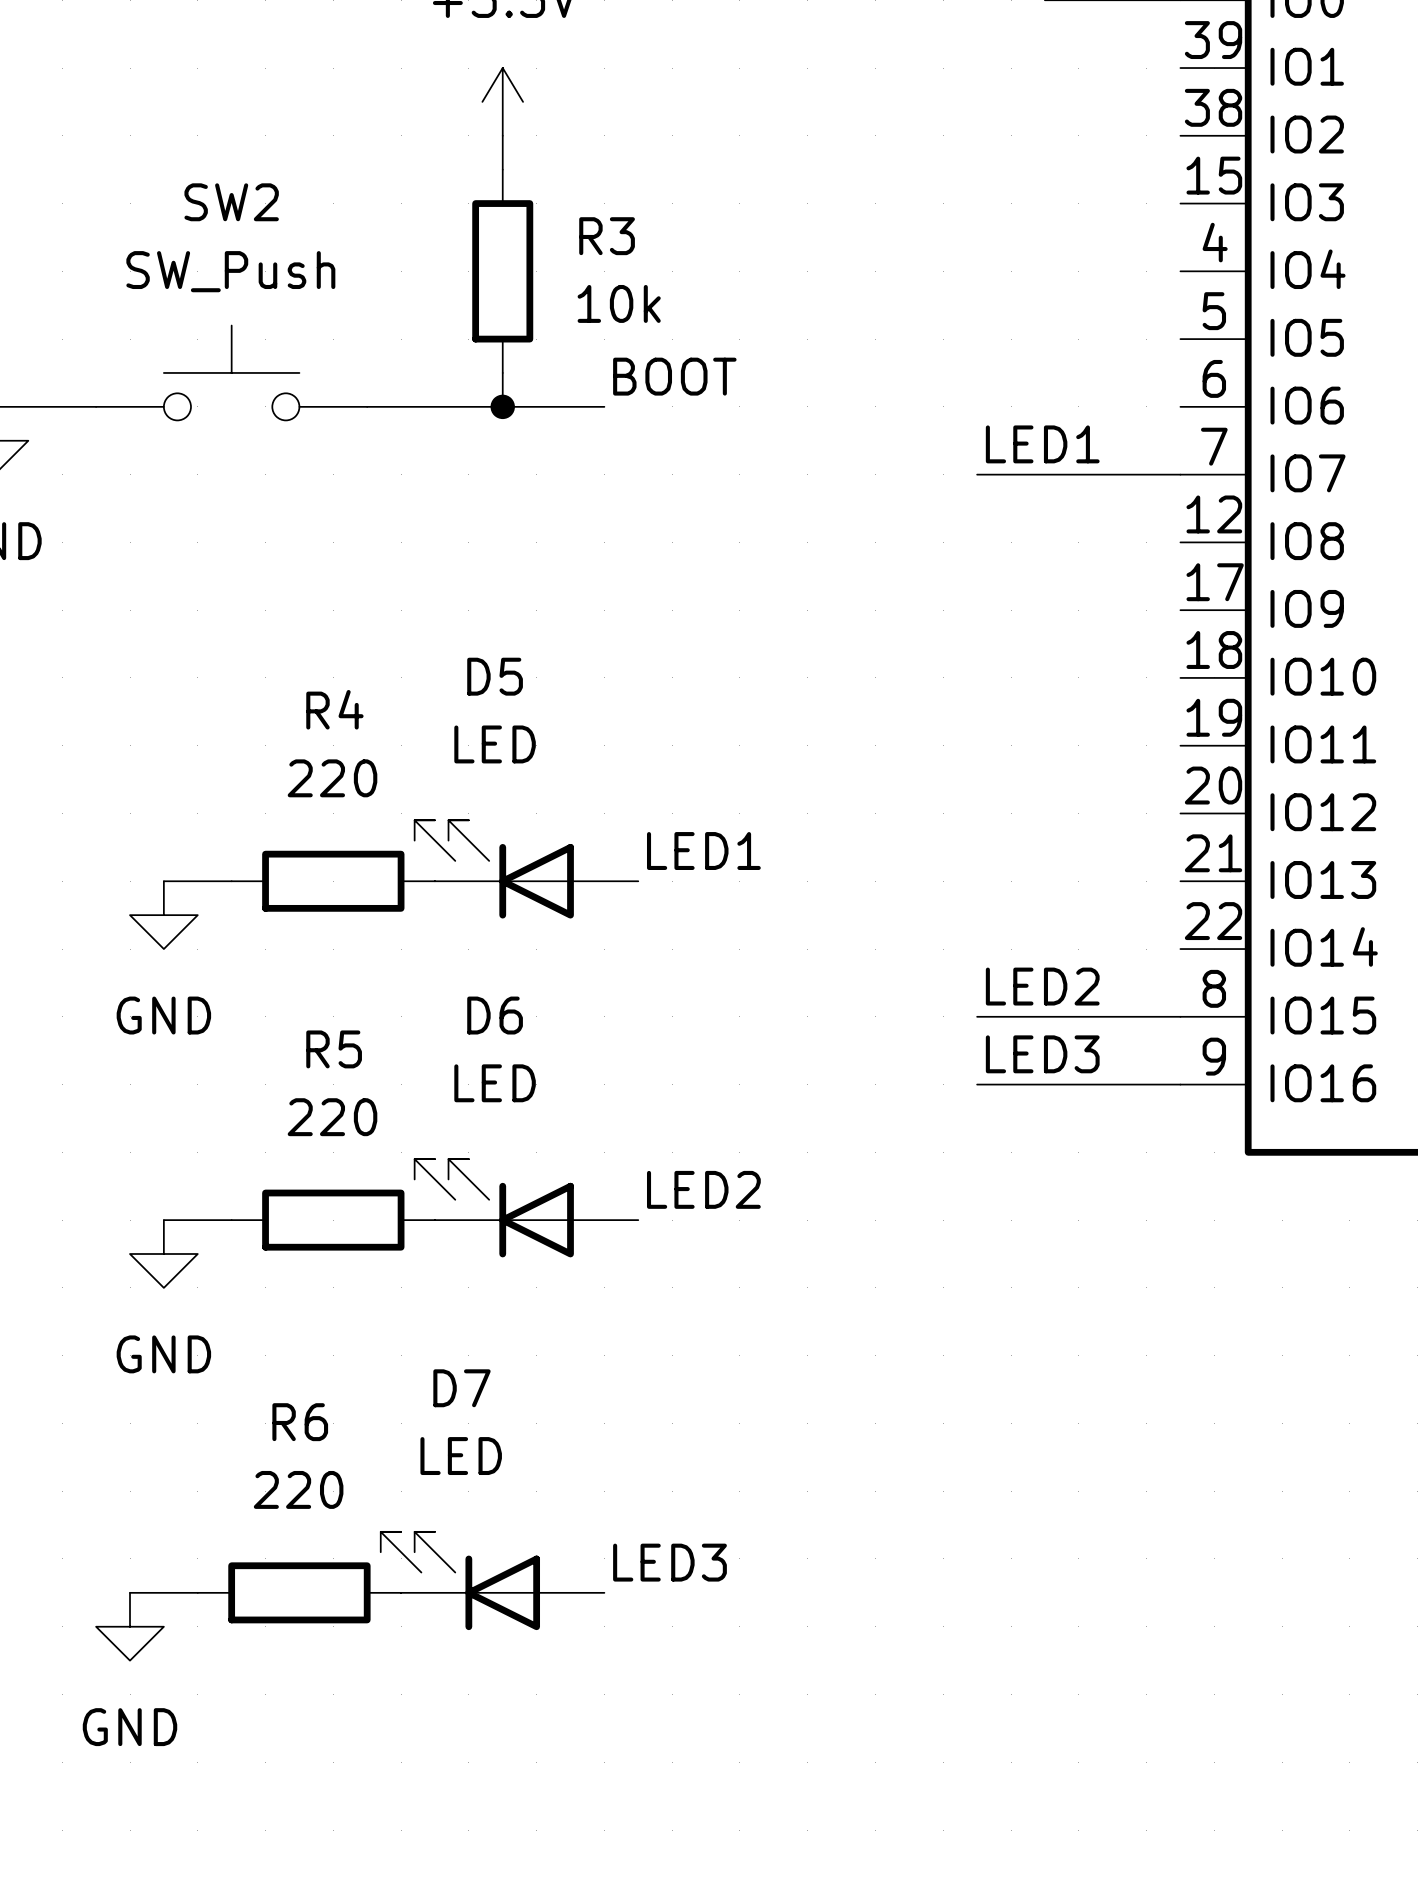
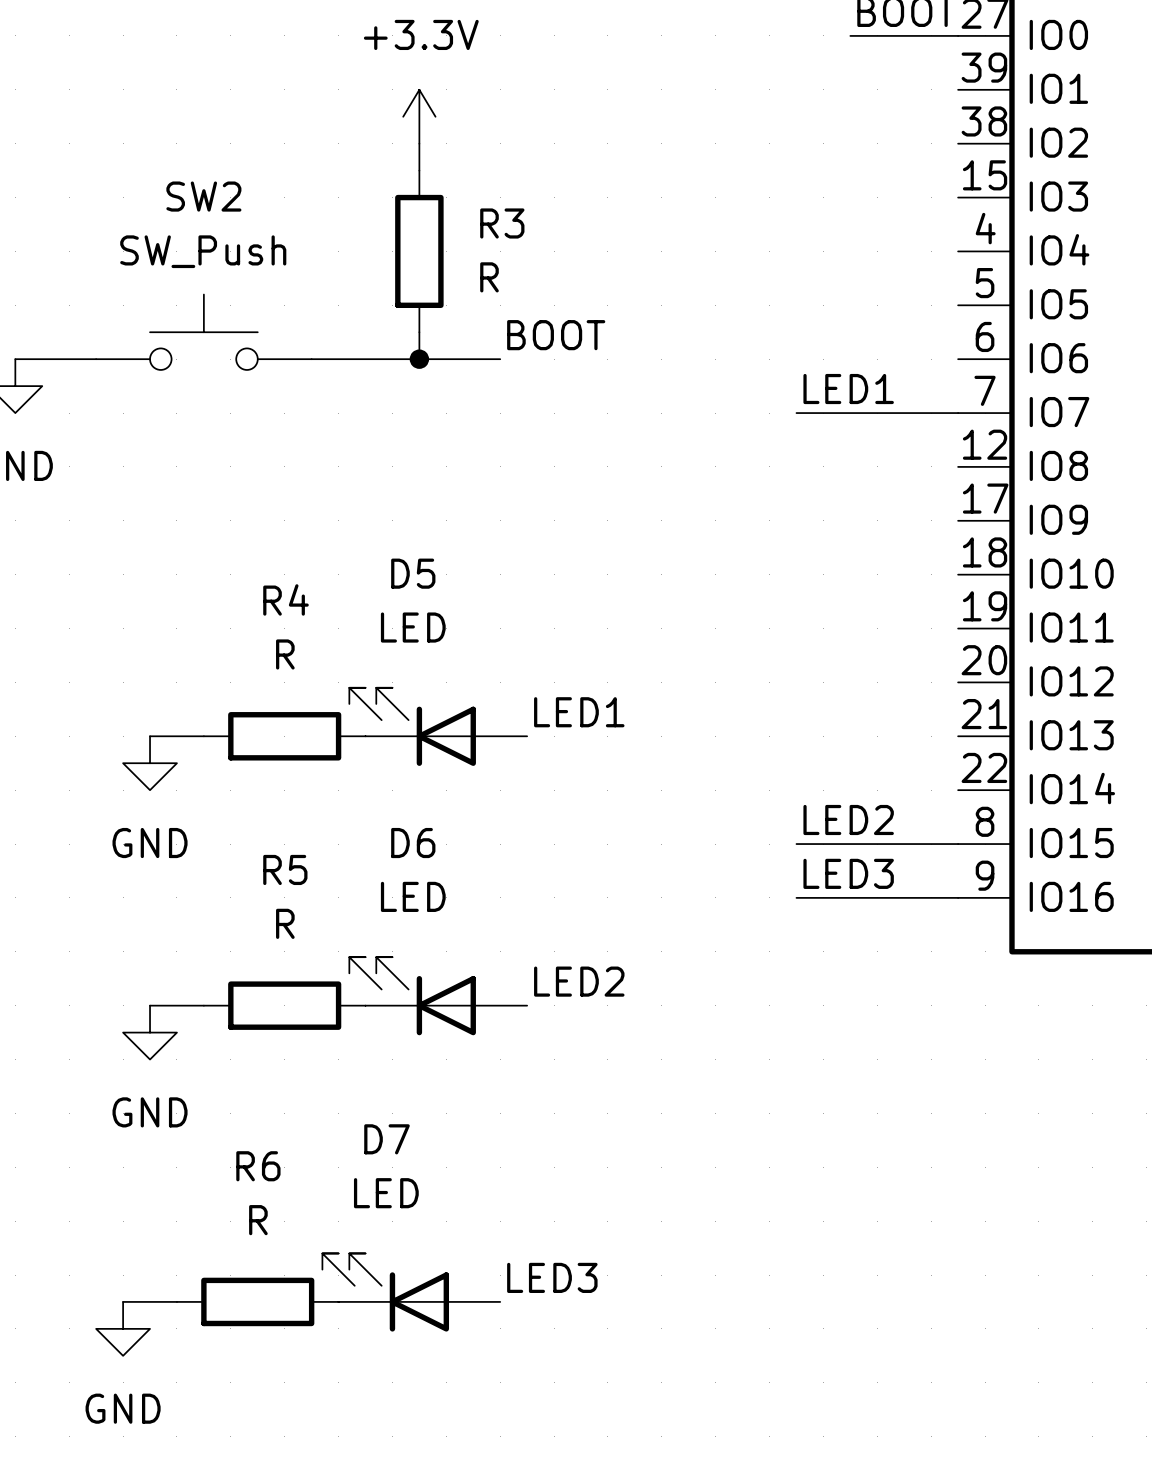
R3 value: 10k (619, 303) -> R (489, 277)
R4 value: 220 (332, 778) -> R (285, 654)
R5 value: 220 (332, 1117) -> R (285, 923)
R6 value: 220 (298, 1489) -> R (258, 1220)

